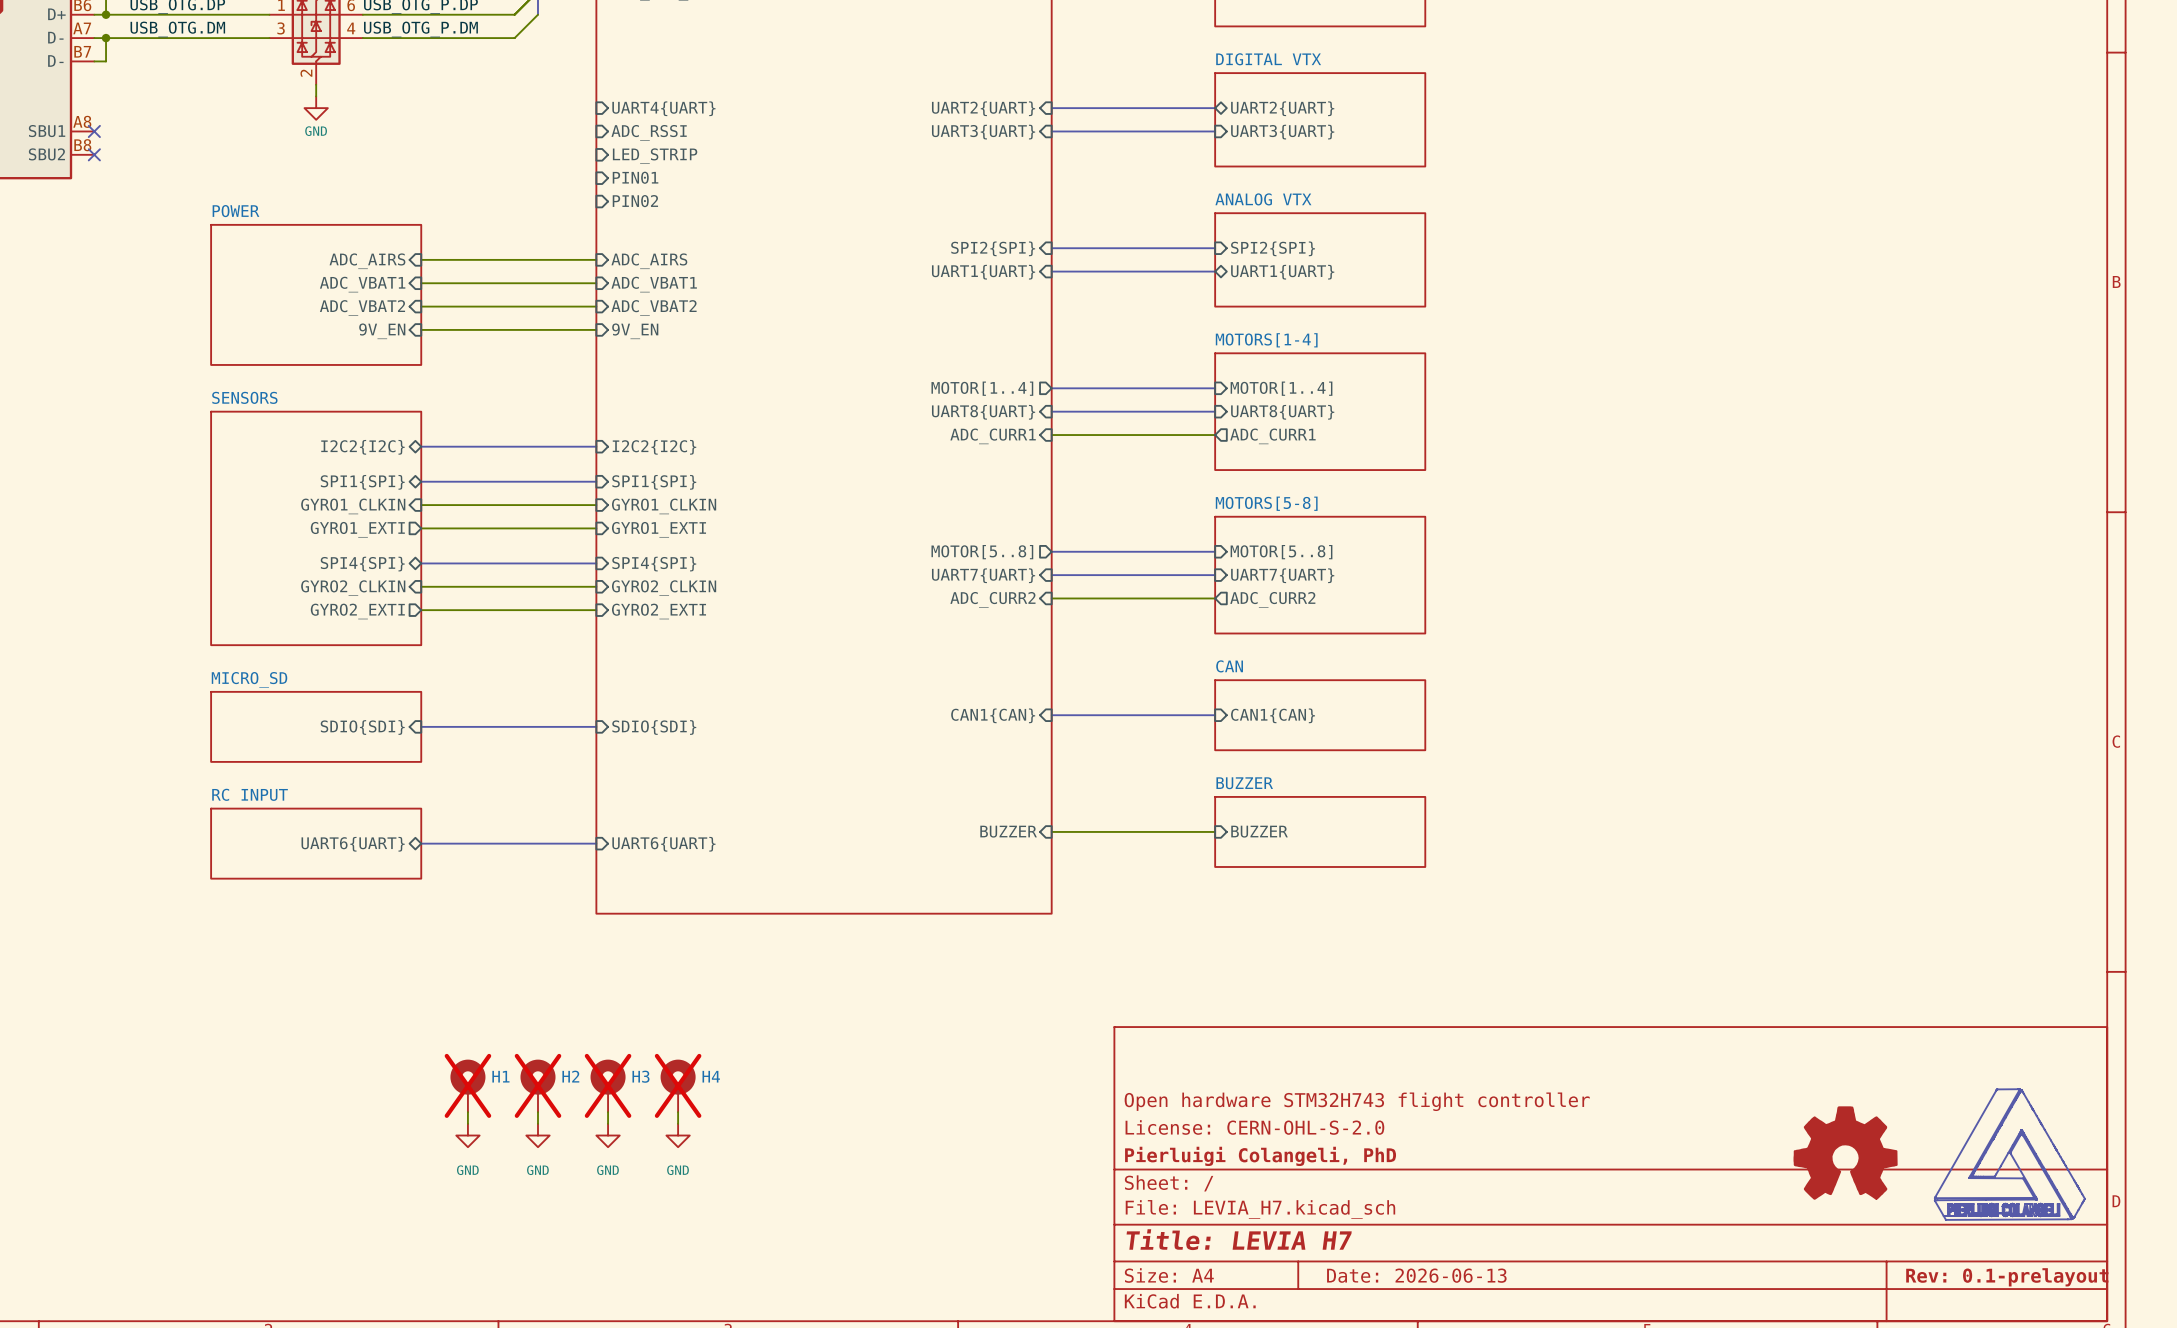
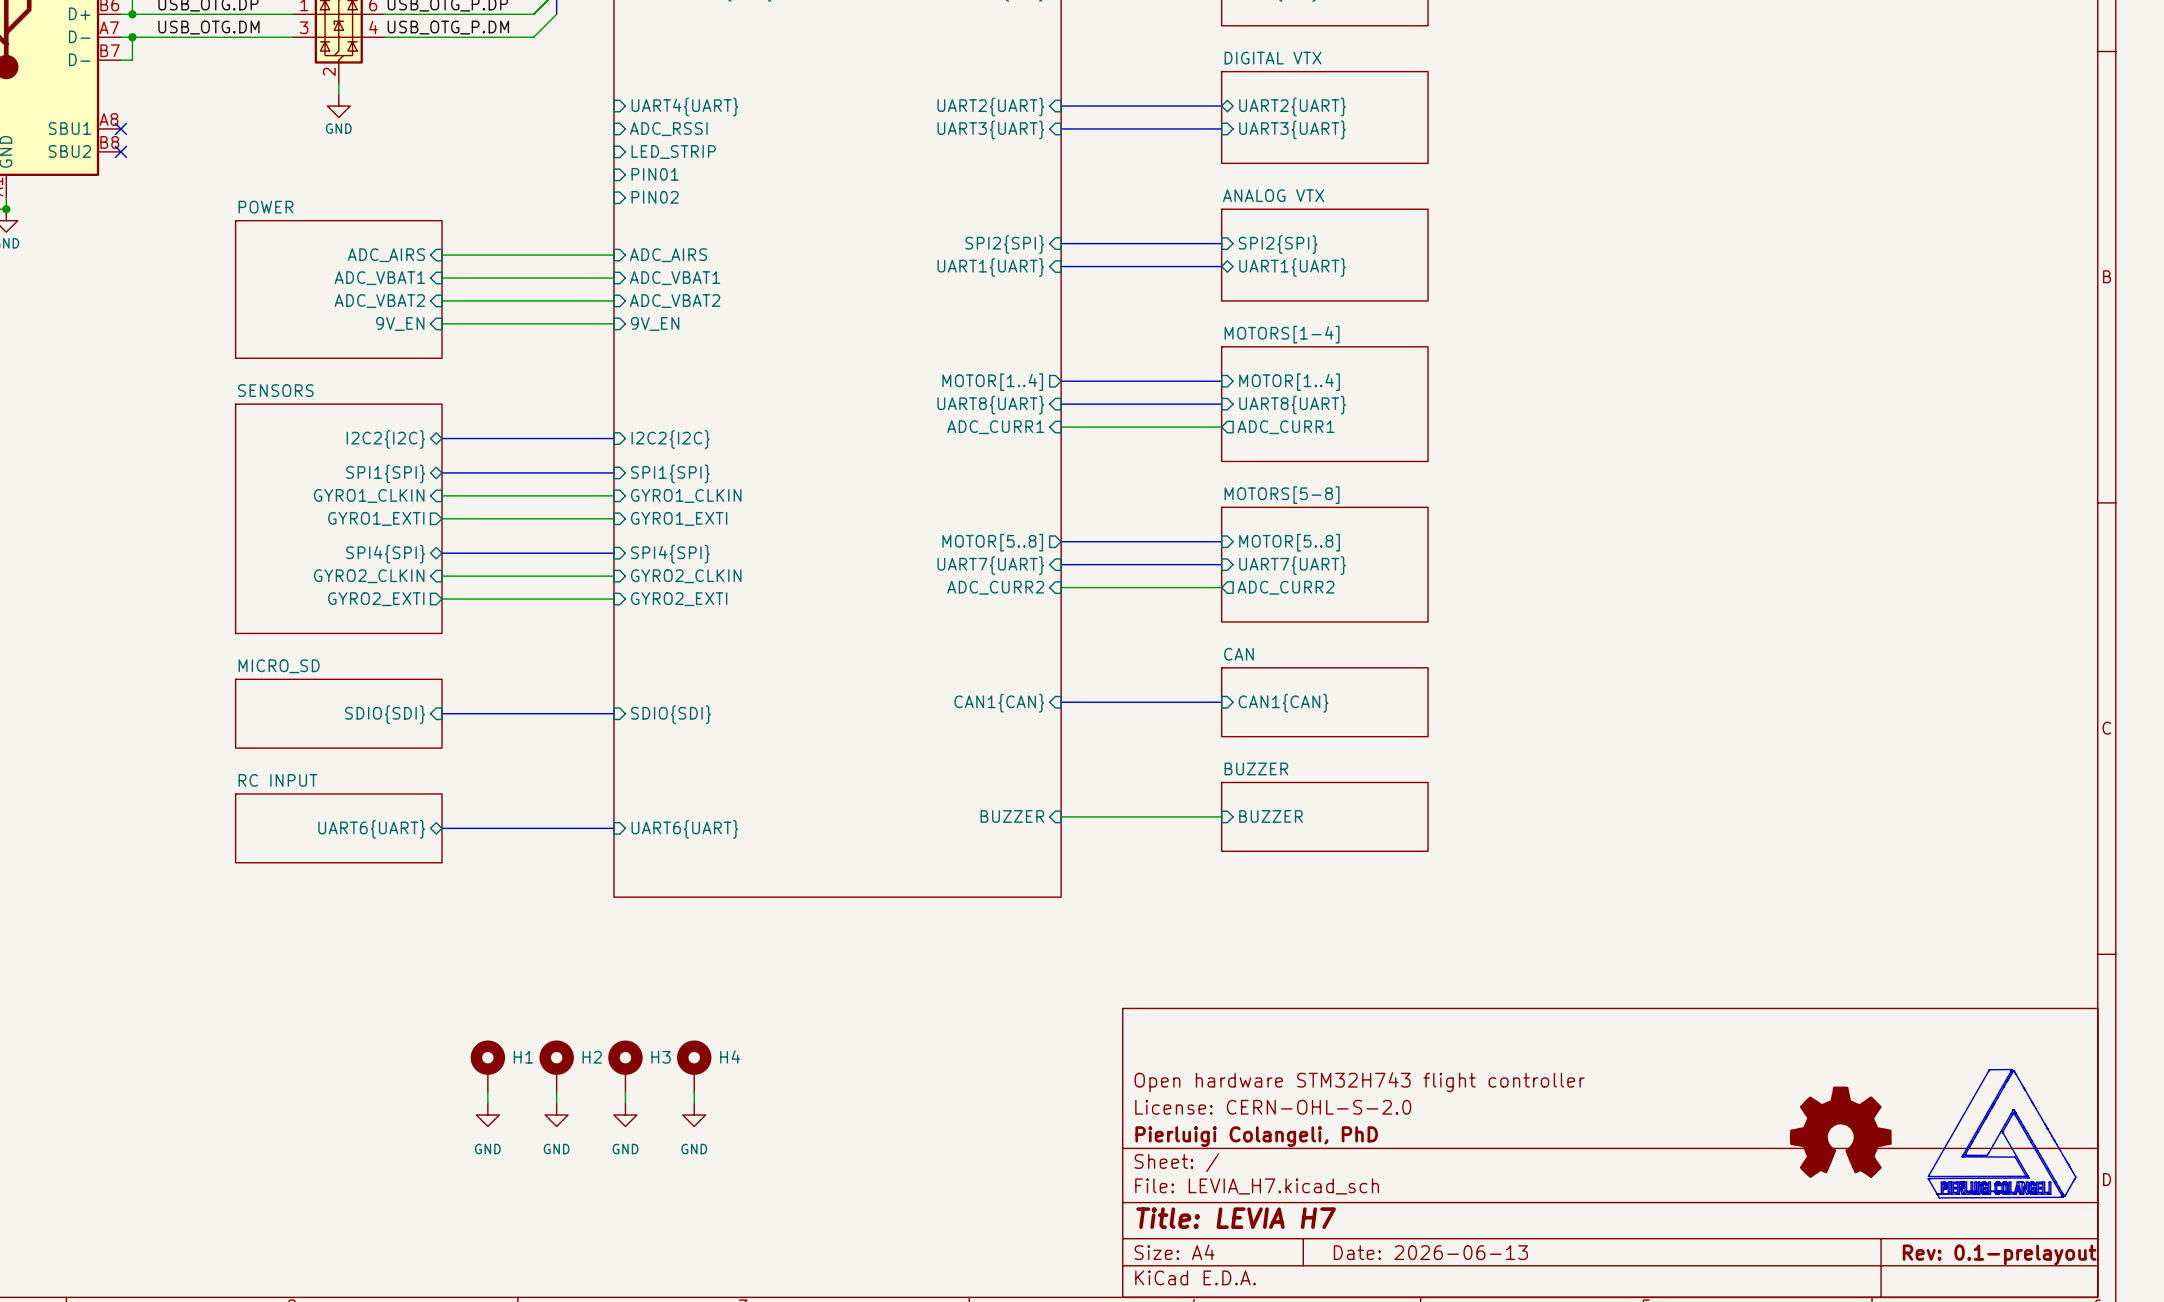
H1 do-not-place cross: (467, 1085) -> none
H2 do-not-place cross: (538, 1085) -> none
H3 do-not-place cross: (608, 1085) -> none
H4 do-not-place cross: (678, 1085) -> none

